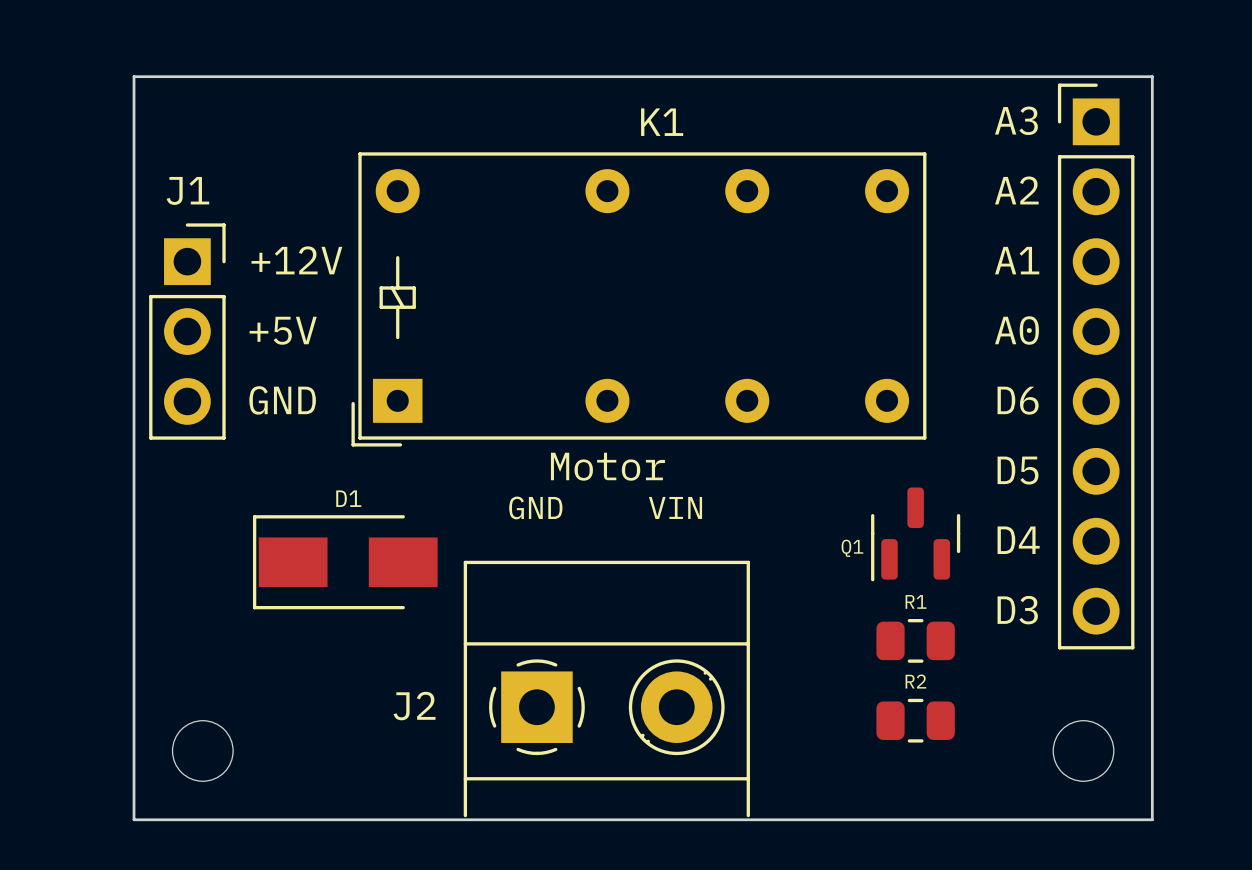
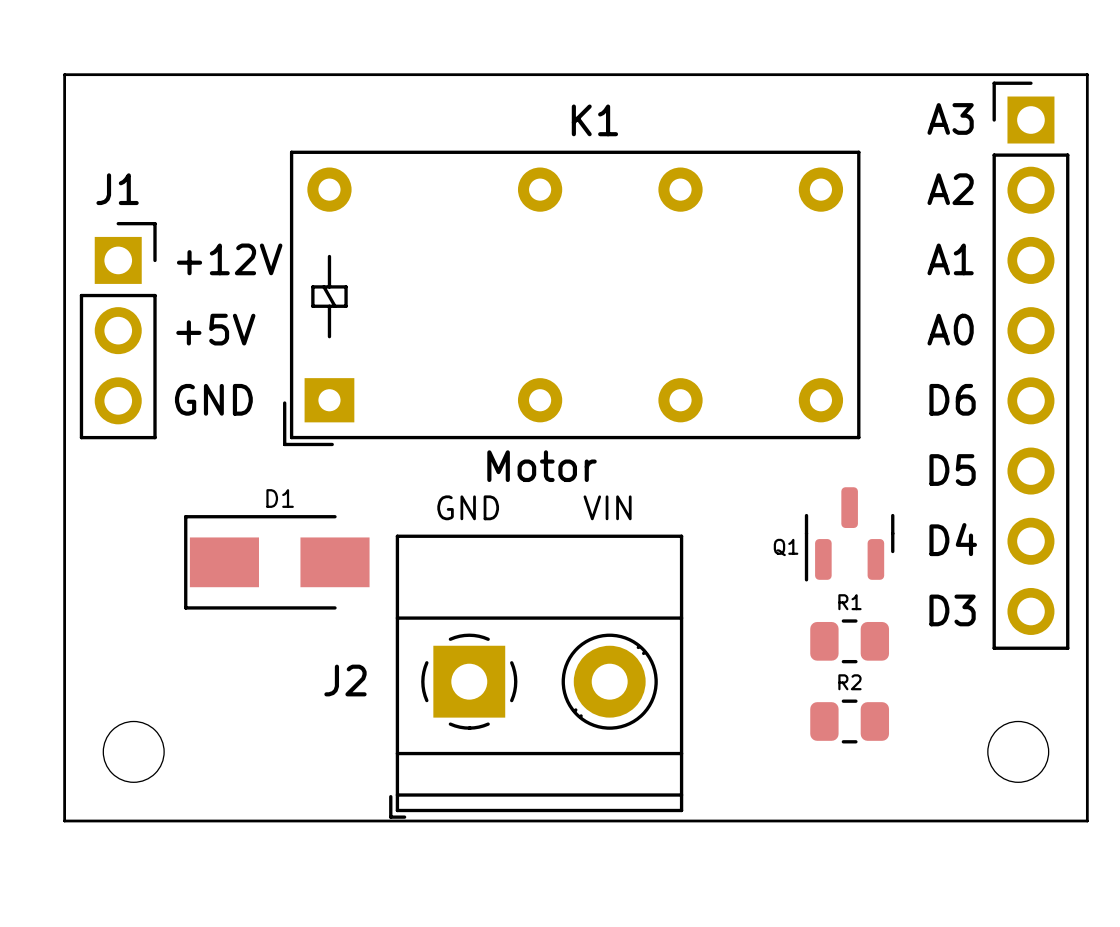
J2 footprint: [463, 560, 750, 818] -> [389, 534, 684, 819]

